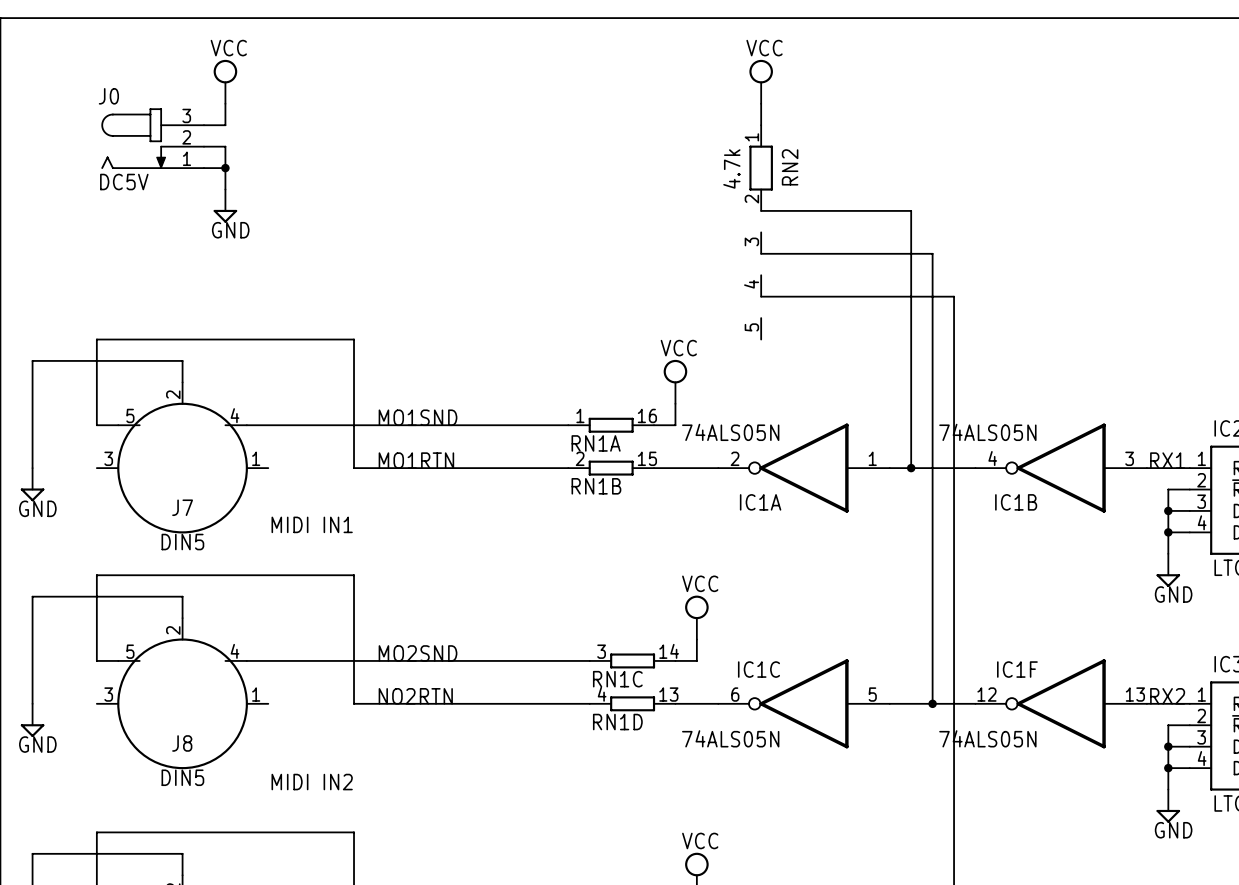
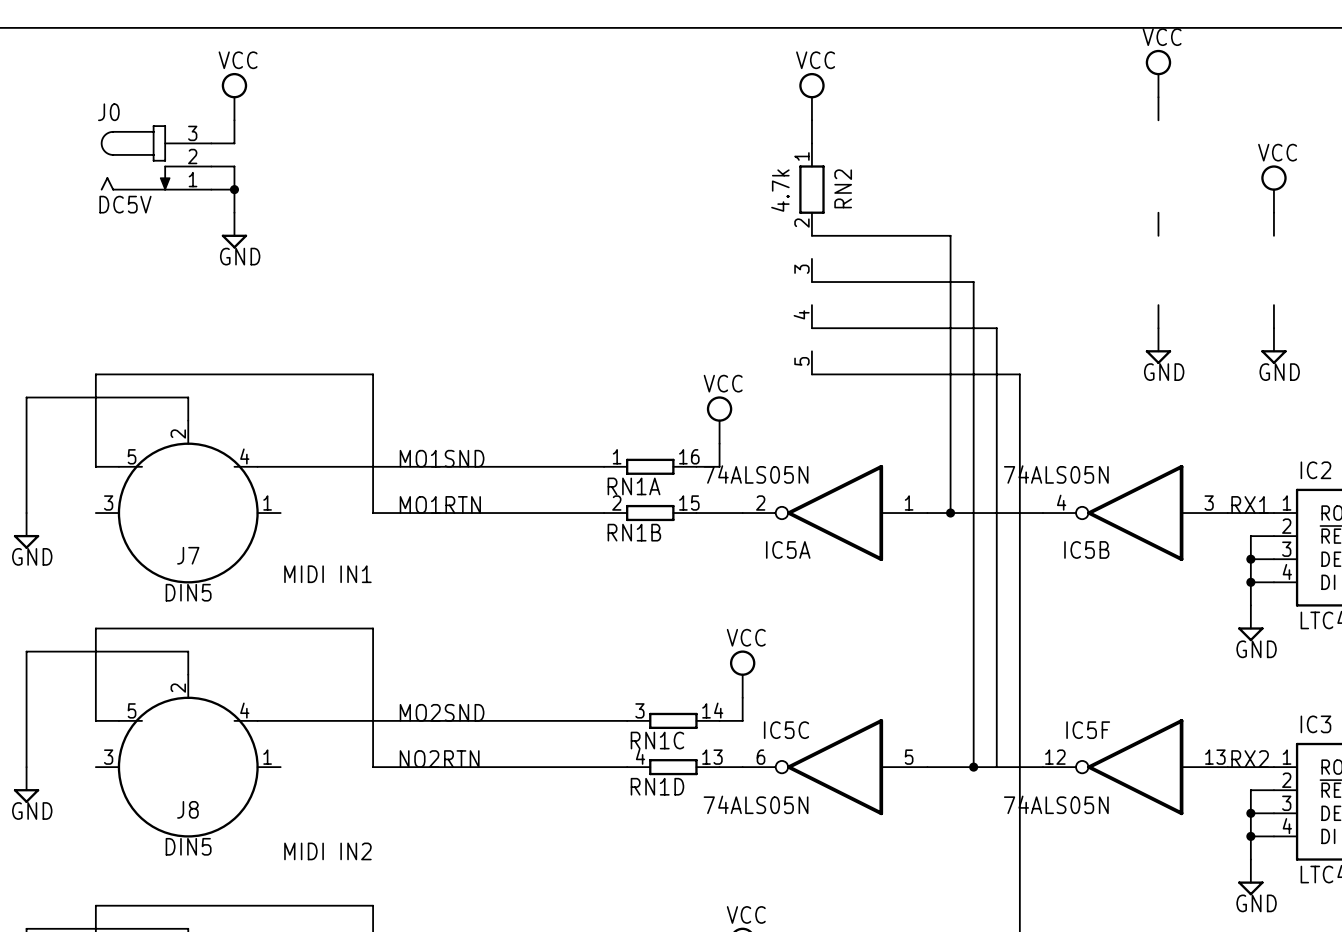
power symbol: none -> VCC (1158, 73)
wire: none -> (1158, 97) (1158, 120)
power symbol: none -> VCC (1273, 189)
wire: none -> (1158, 212) (1158, 235)
wire: none -> (1273, 212) (1273, 235)
wire: (889, 210) (911, 210) (911, 253) (932, 253) (932, 296) (954, 296) (954, 339) -> (950, 235) (950, 513) (927, 513)
wire: none -> (1158, 305) (1158, 328)
wire: none -> (1273, 305) (1273, 328)
power symbol: none -> GND (1158, 346)
power symbol: none -> GND (1273, 346)
wire: none -> (811, 374) (1019, 374)
IC5A: none -> 74ALS05N (835, 513)
IC1A: 74ALS05N (804, 468) -> none
wire: none -> (973, 513) (973, 767)
junction position: (911, 468) -> (950, 513)
IC1B name: IC1B (1016, 502) -> IC5B (1086, 549)
IC1F name: IC1F (1017, 669) -> IC5F (1088, 730)
IC5C: none -> 74ALS05N (835, 767)
IC1C: 74ALS05N (804, 703) -> none
junction position: (932, 703) -> (973, 767)

